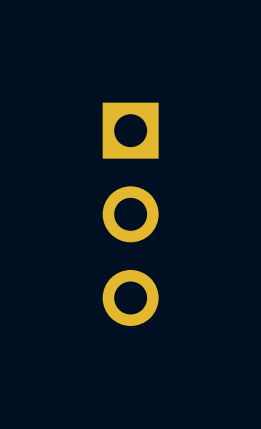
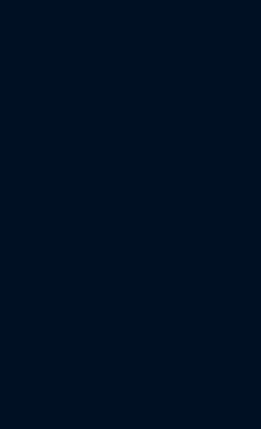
part: (130, 214) -> none

